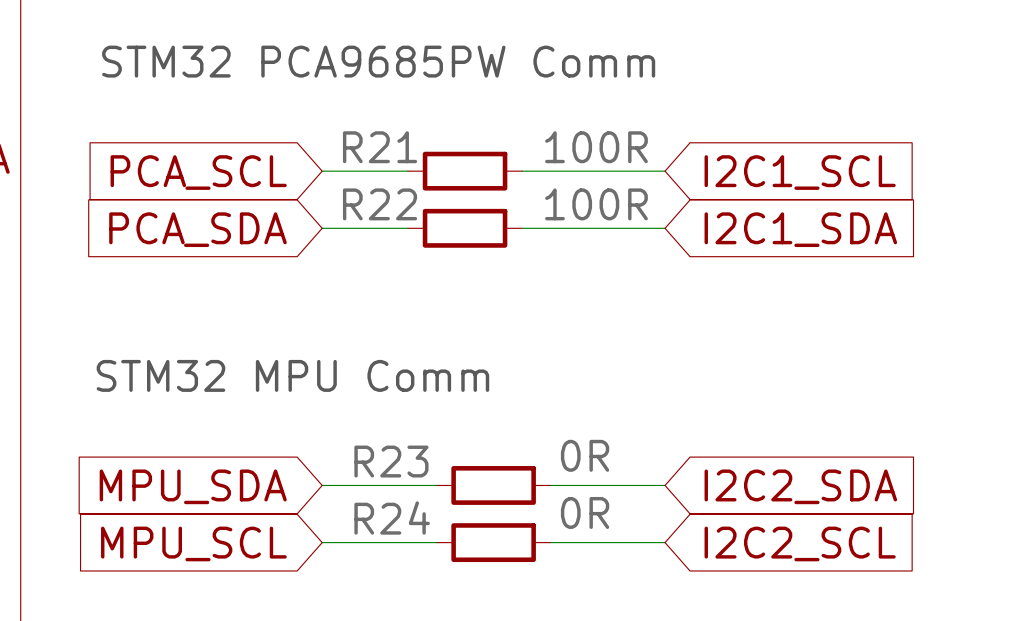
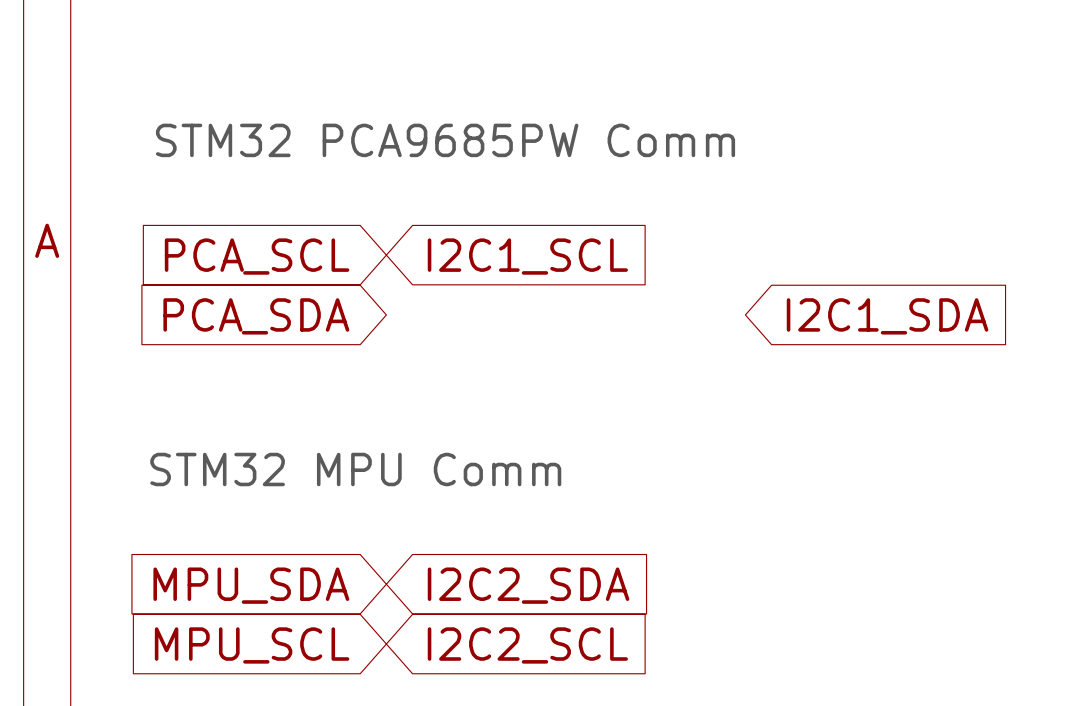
wire: (322, 171) (407, 171) -> none
R21: 100R (465, 171) -> none
wire: (522, 171) (665, 171) -> none
global label position: I2C1_SCL (800, 172) -> I2C1_SCL (527, 256)
wire: (322, 228) (407, 228) -> none
R22: 100R (465, 228) -> none
wire: (522, 228) (665, 228) -> none
wire: (322, 485) (436, 485) -> none
R23: 0R (493, 485) -> none
wire: (550, 485) (665, 485) -> none
global label position: I2C2_SDA (800, 486) -> I2C2_SDA (528, 585)
wire: (322, 542) (436, 542) -> none
R24: 0R (493, 542) -> none
wire: (550, 542) (665, 542) -> none
global label position: I2C2_SCL (800, 543) -> I2C2_SCL (527, 645)

